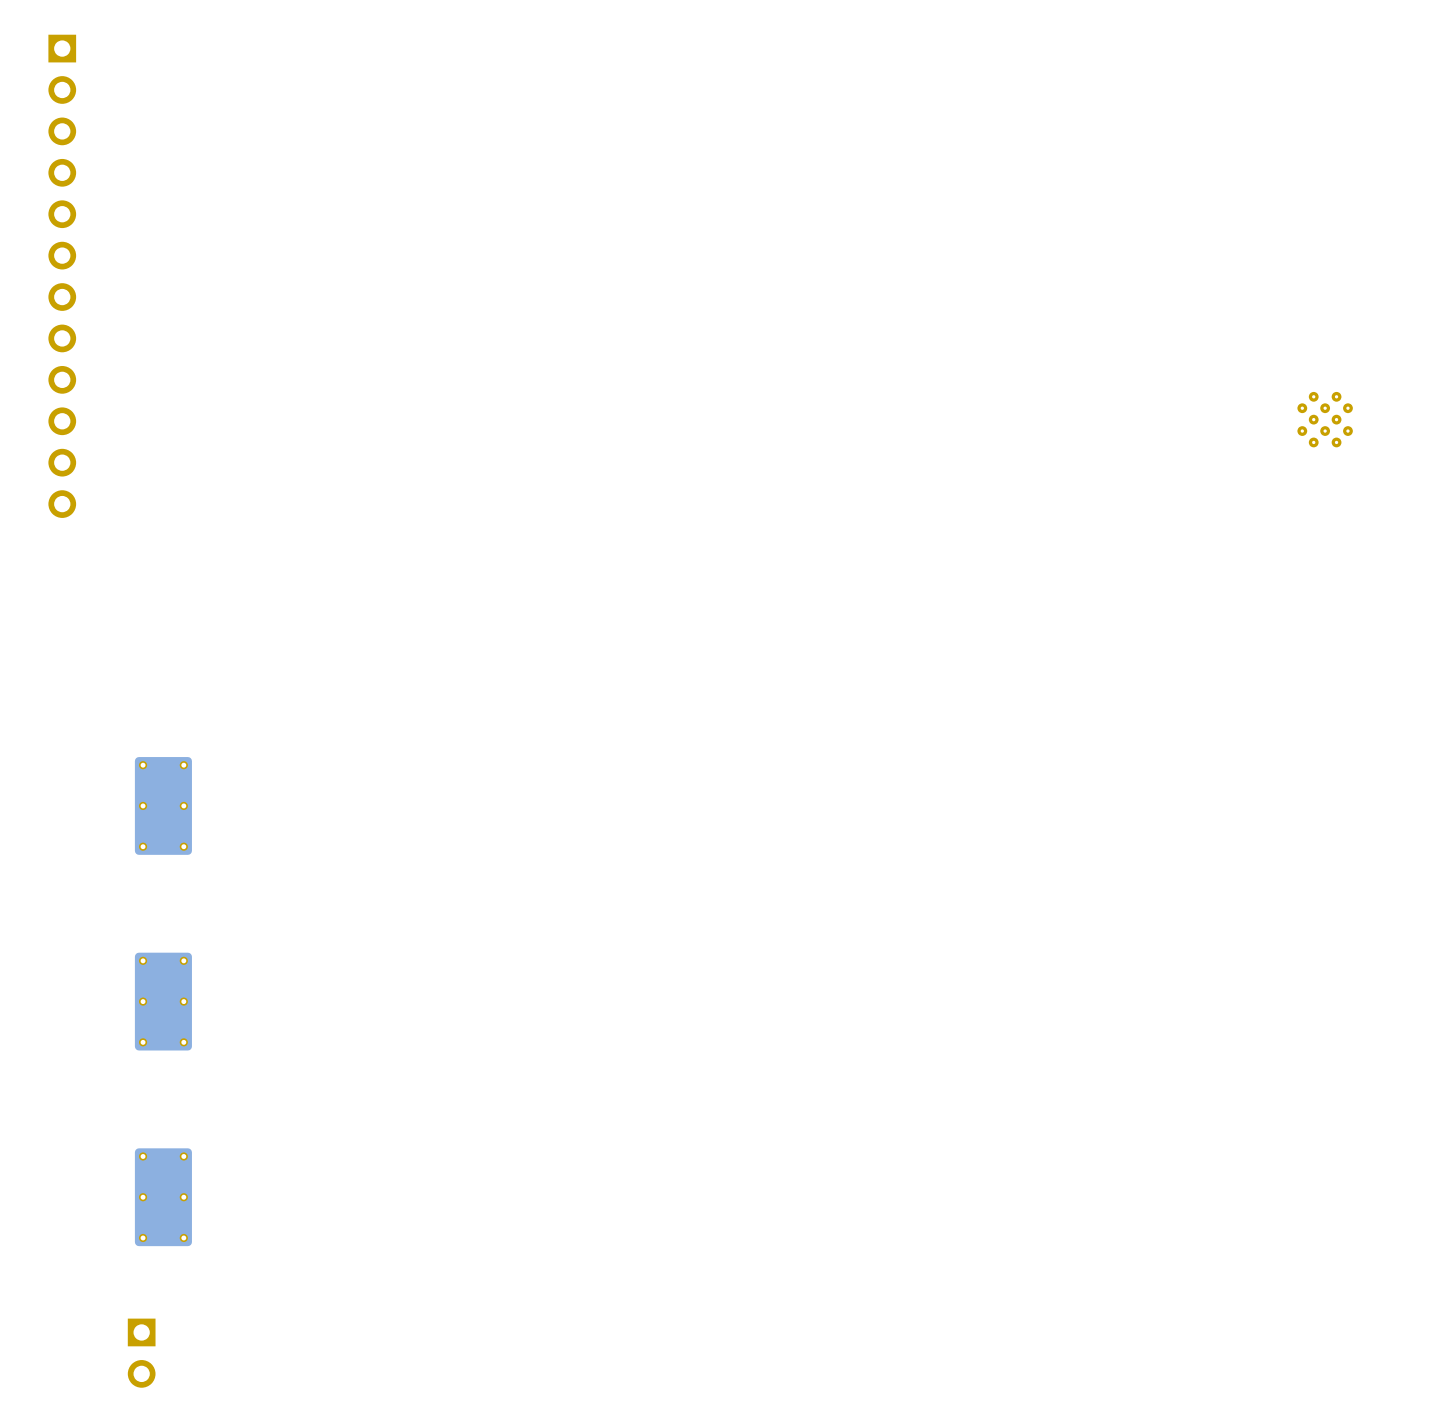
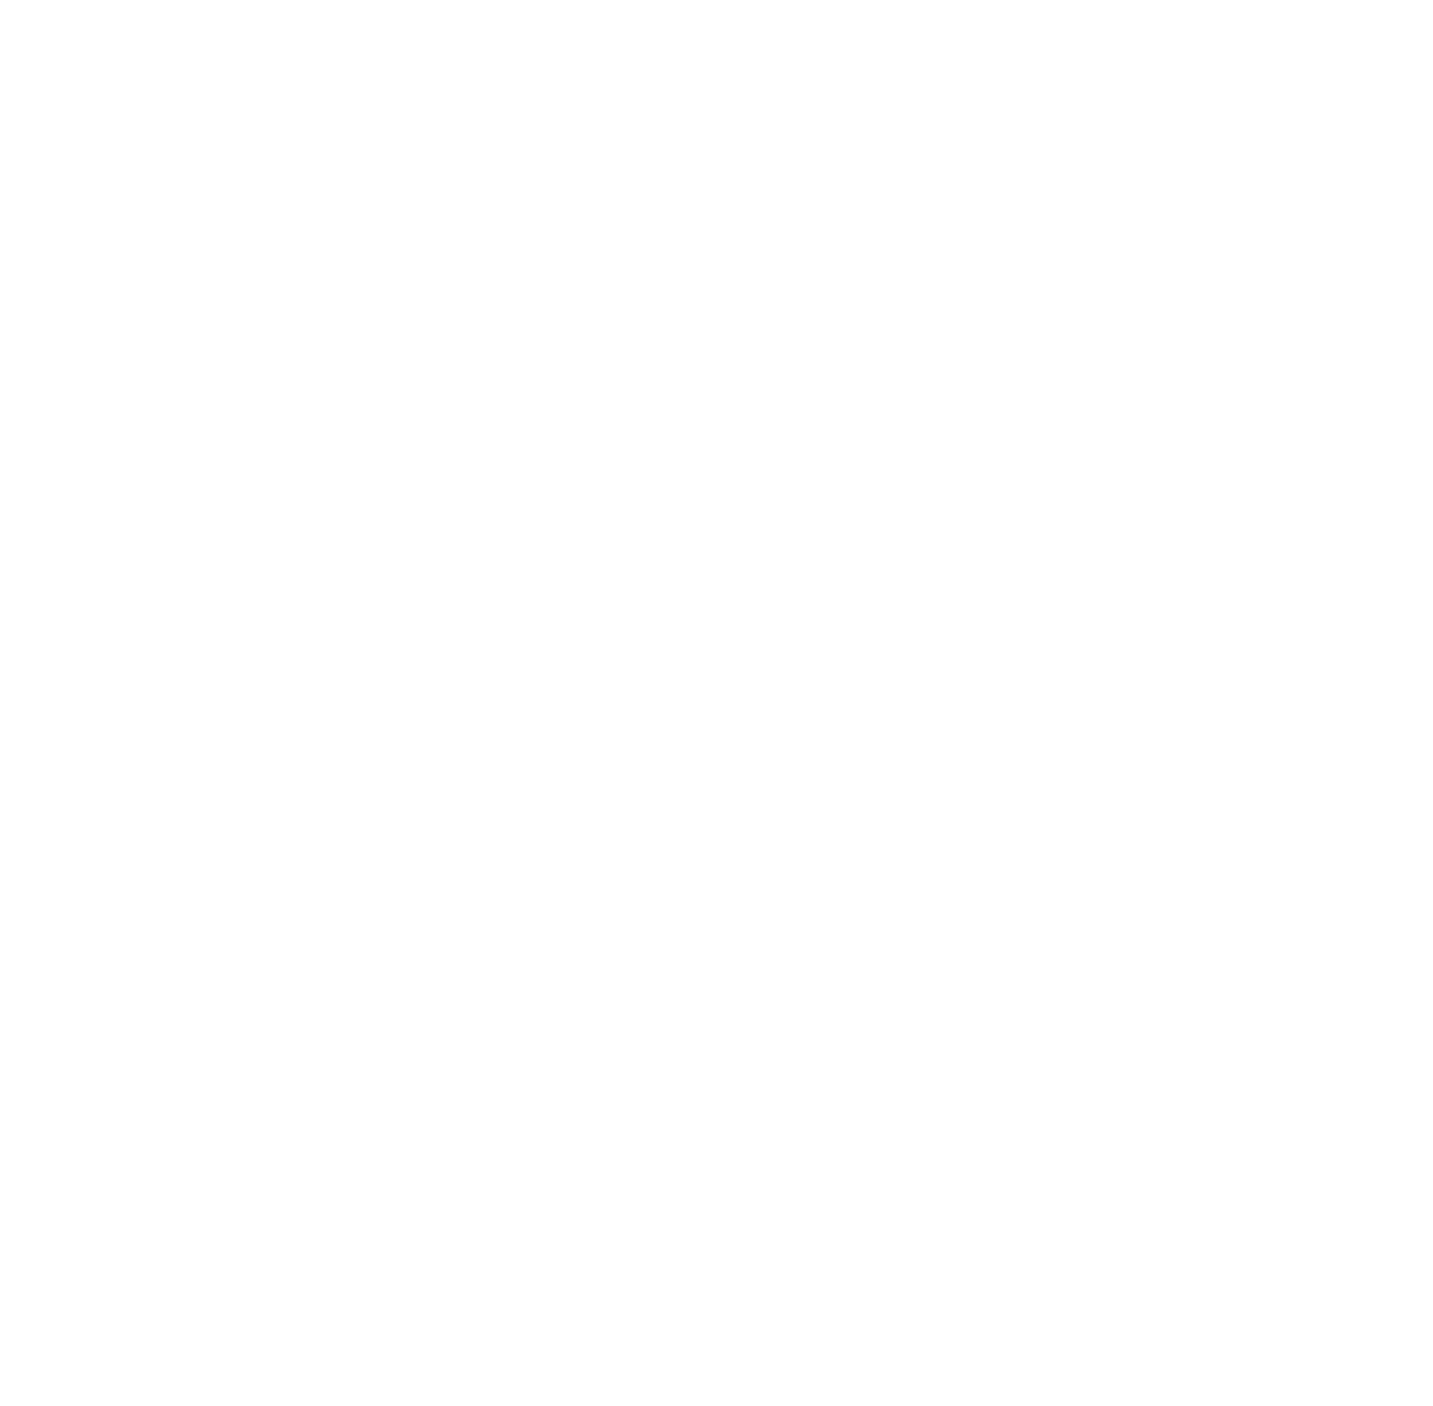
part: (62, 276) -> none
part: (1325, 419) -> none
part: (163, 805) -> none
part: (163, 1001) -> none
part: (163, 1197) -> none
part: (141, 1353) -> none

